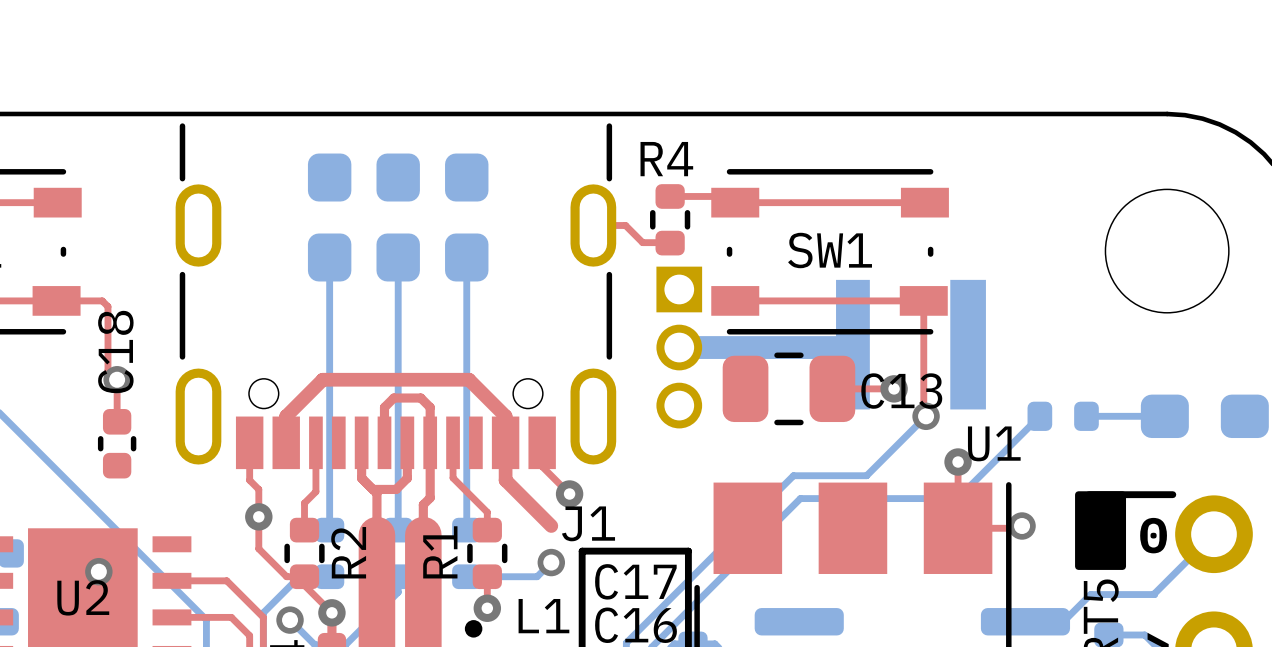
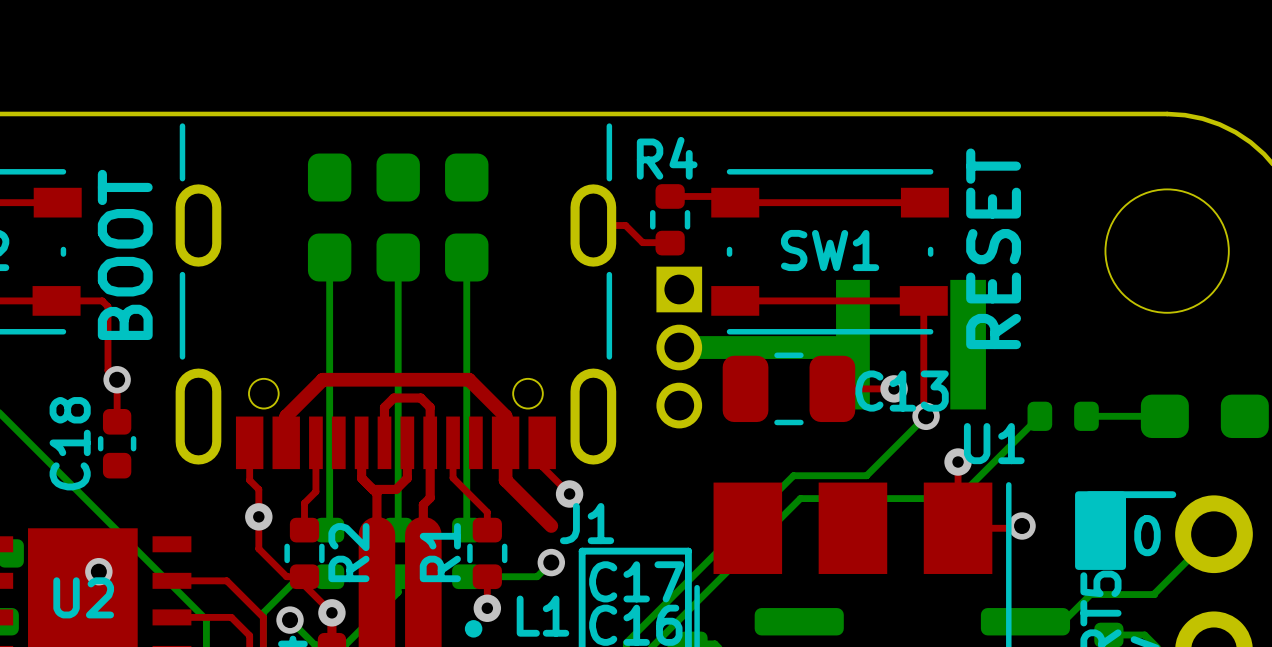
text: none -> RESET (993, 248)
text: none -> BOOT (125, 254)
C18 name position: C18 (115, 351) -> C18 (70, 443)

